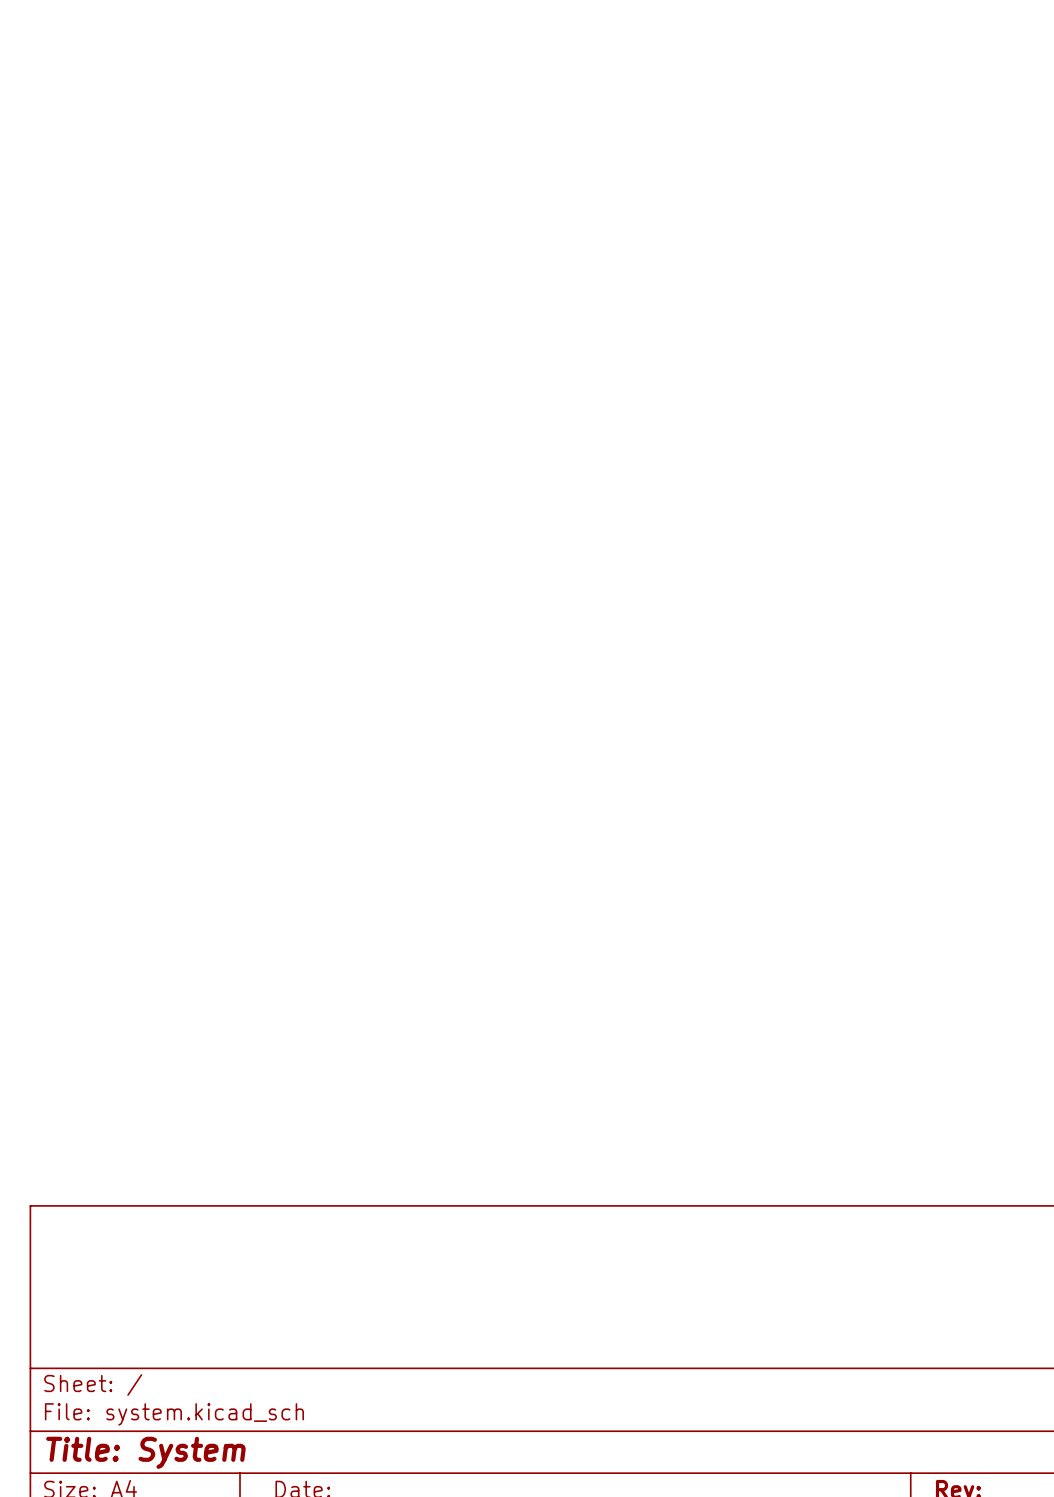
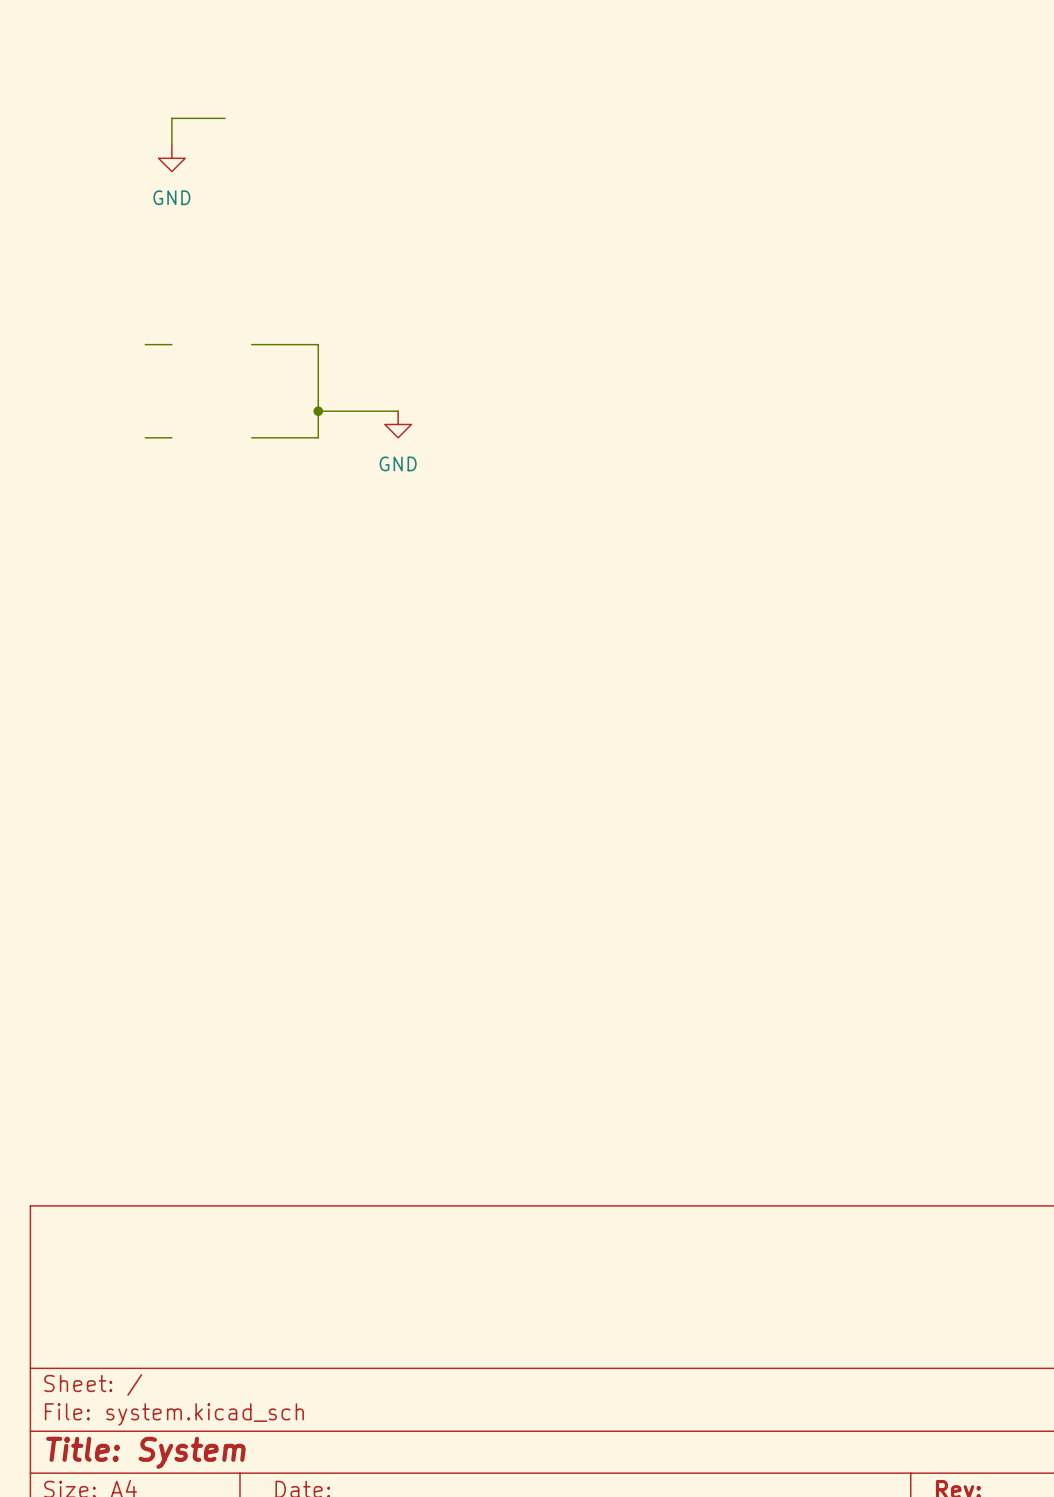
wire: none -> (225, 118) (171, 118) (171, 144)
power symbol: none -> GND (171, 158)
wire: none -> (145, 344) (171, 344)
wire: none -> (251, 344) (318, 344) (318, 437) (251, 437)
wire: none -> (318, 411) (398, 411)
junction: none -> (318, 411)
power symbol: none -> GND (398, 424)
wire: none -> (145, 437) (171, 437)

